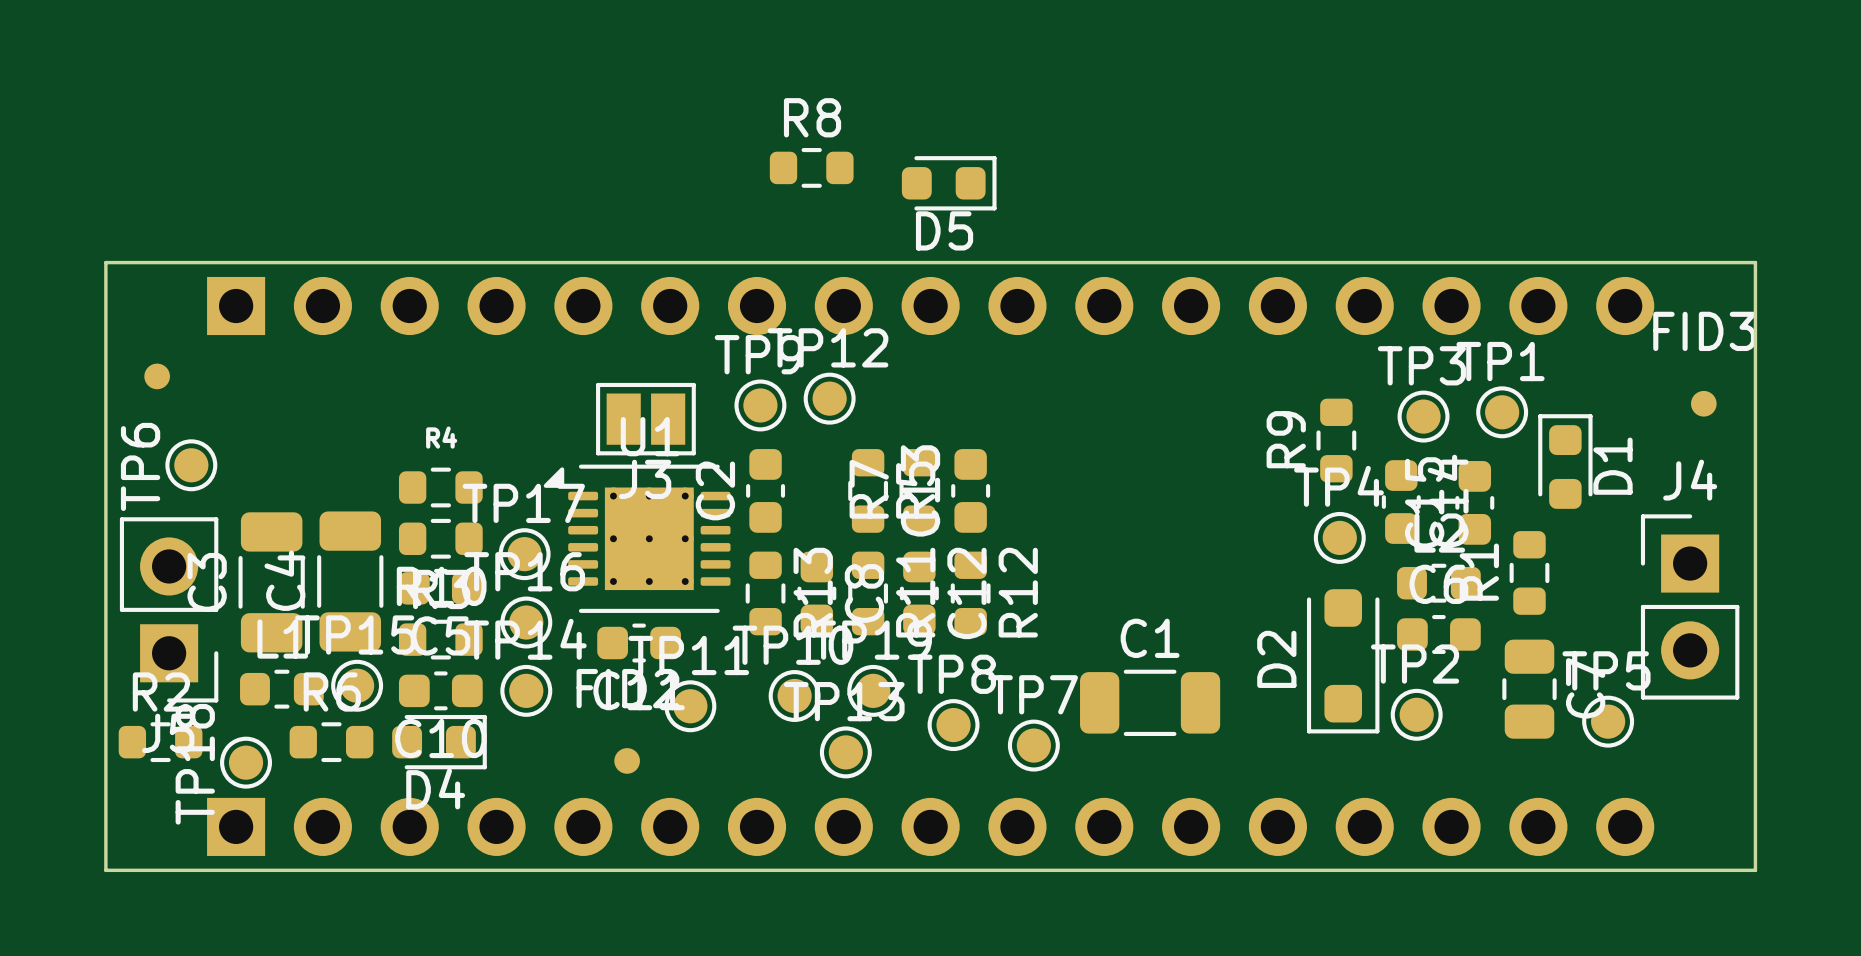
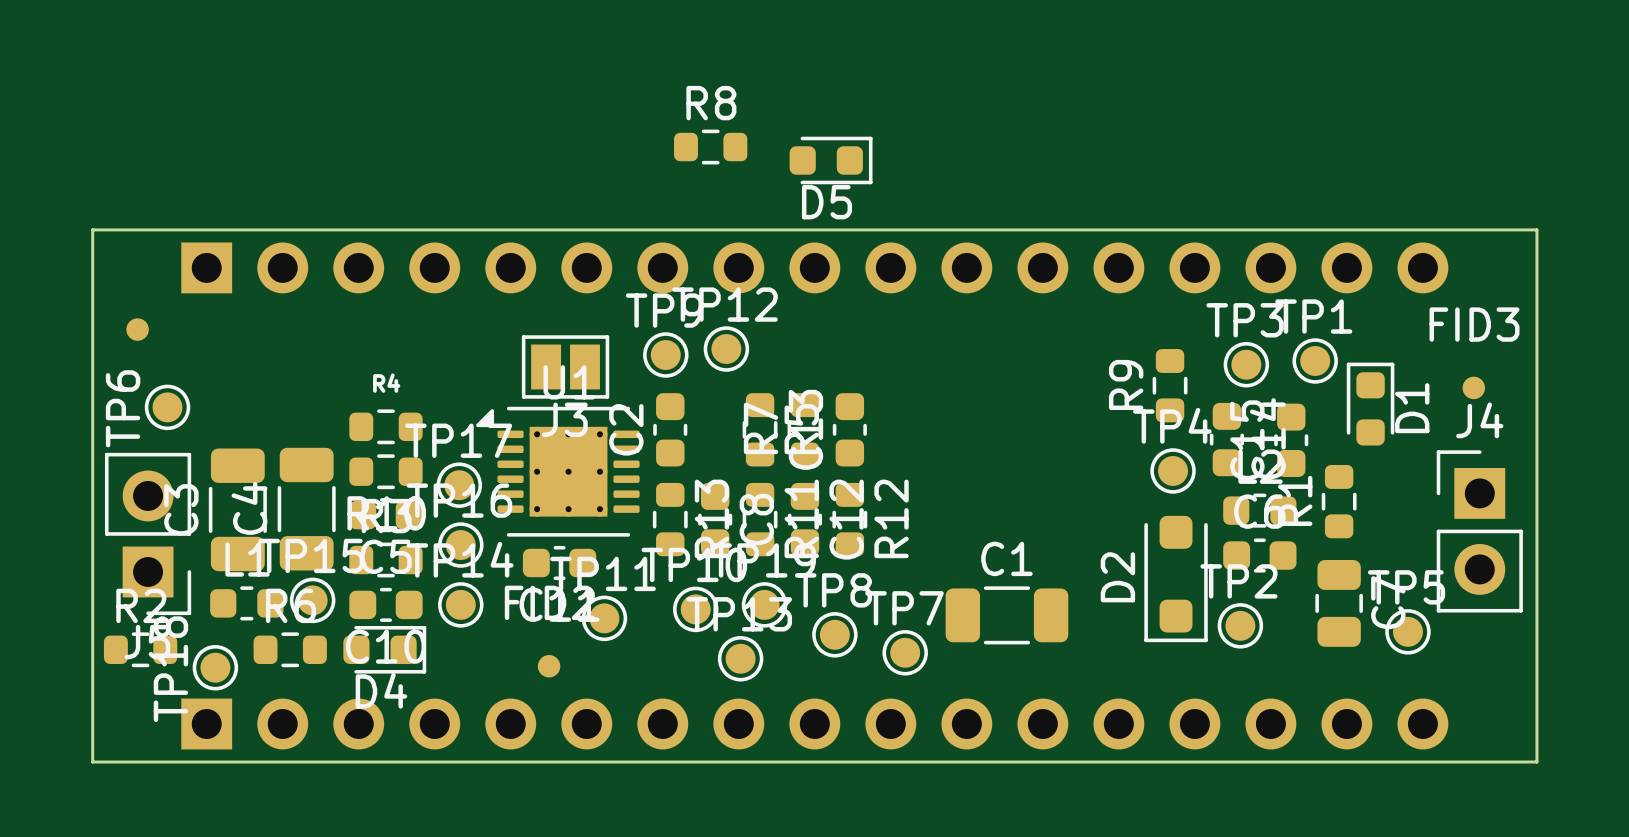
FID3 position: (1703, 403) -> (1473, 387)

